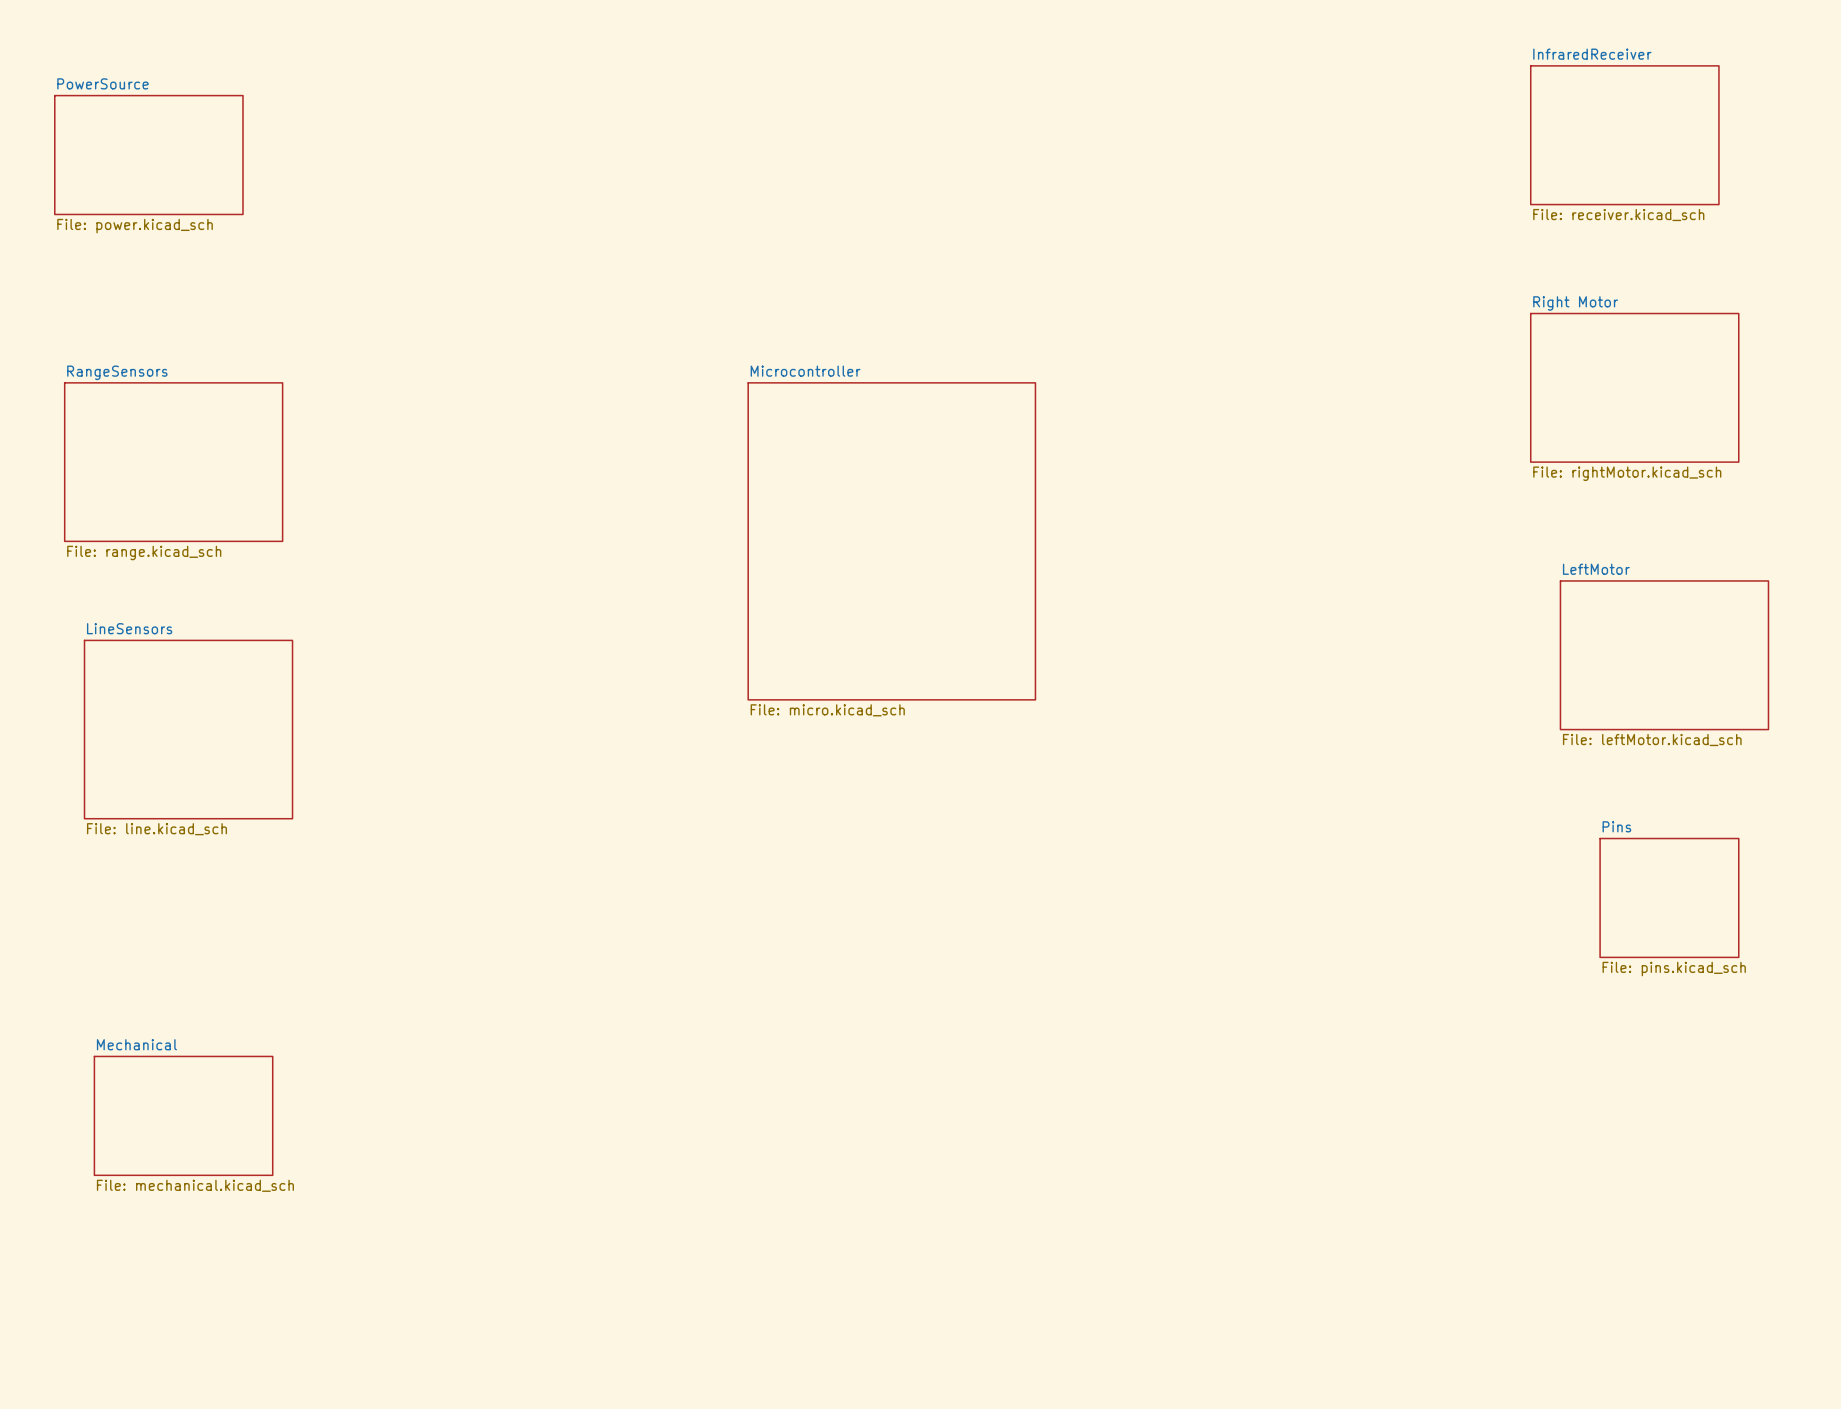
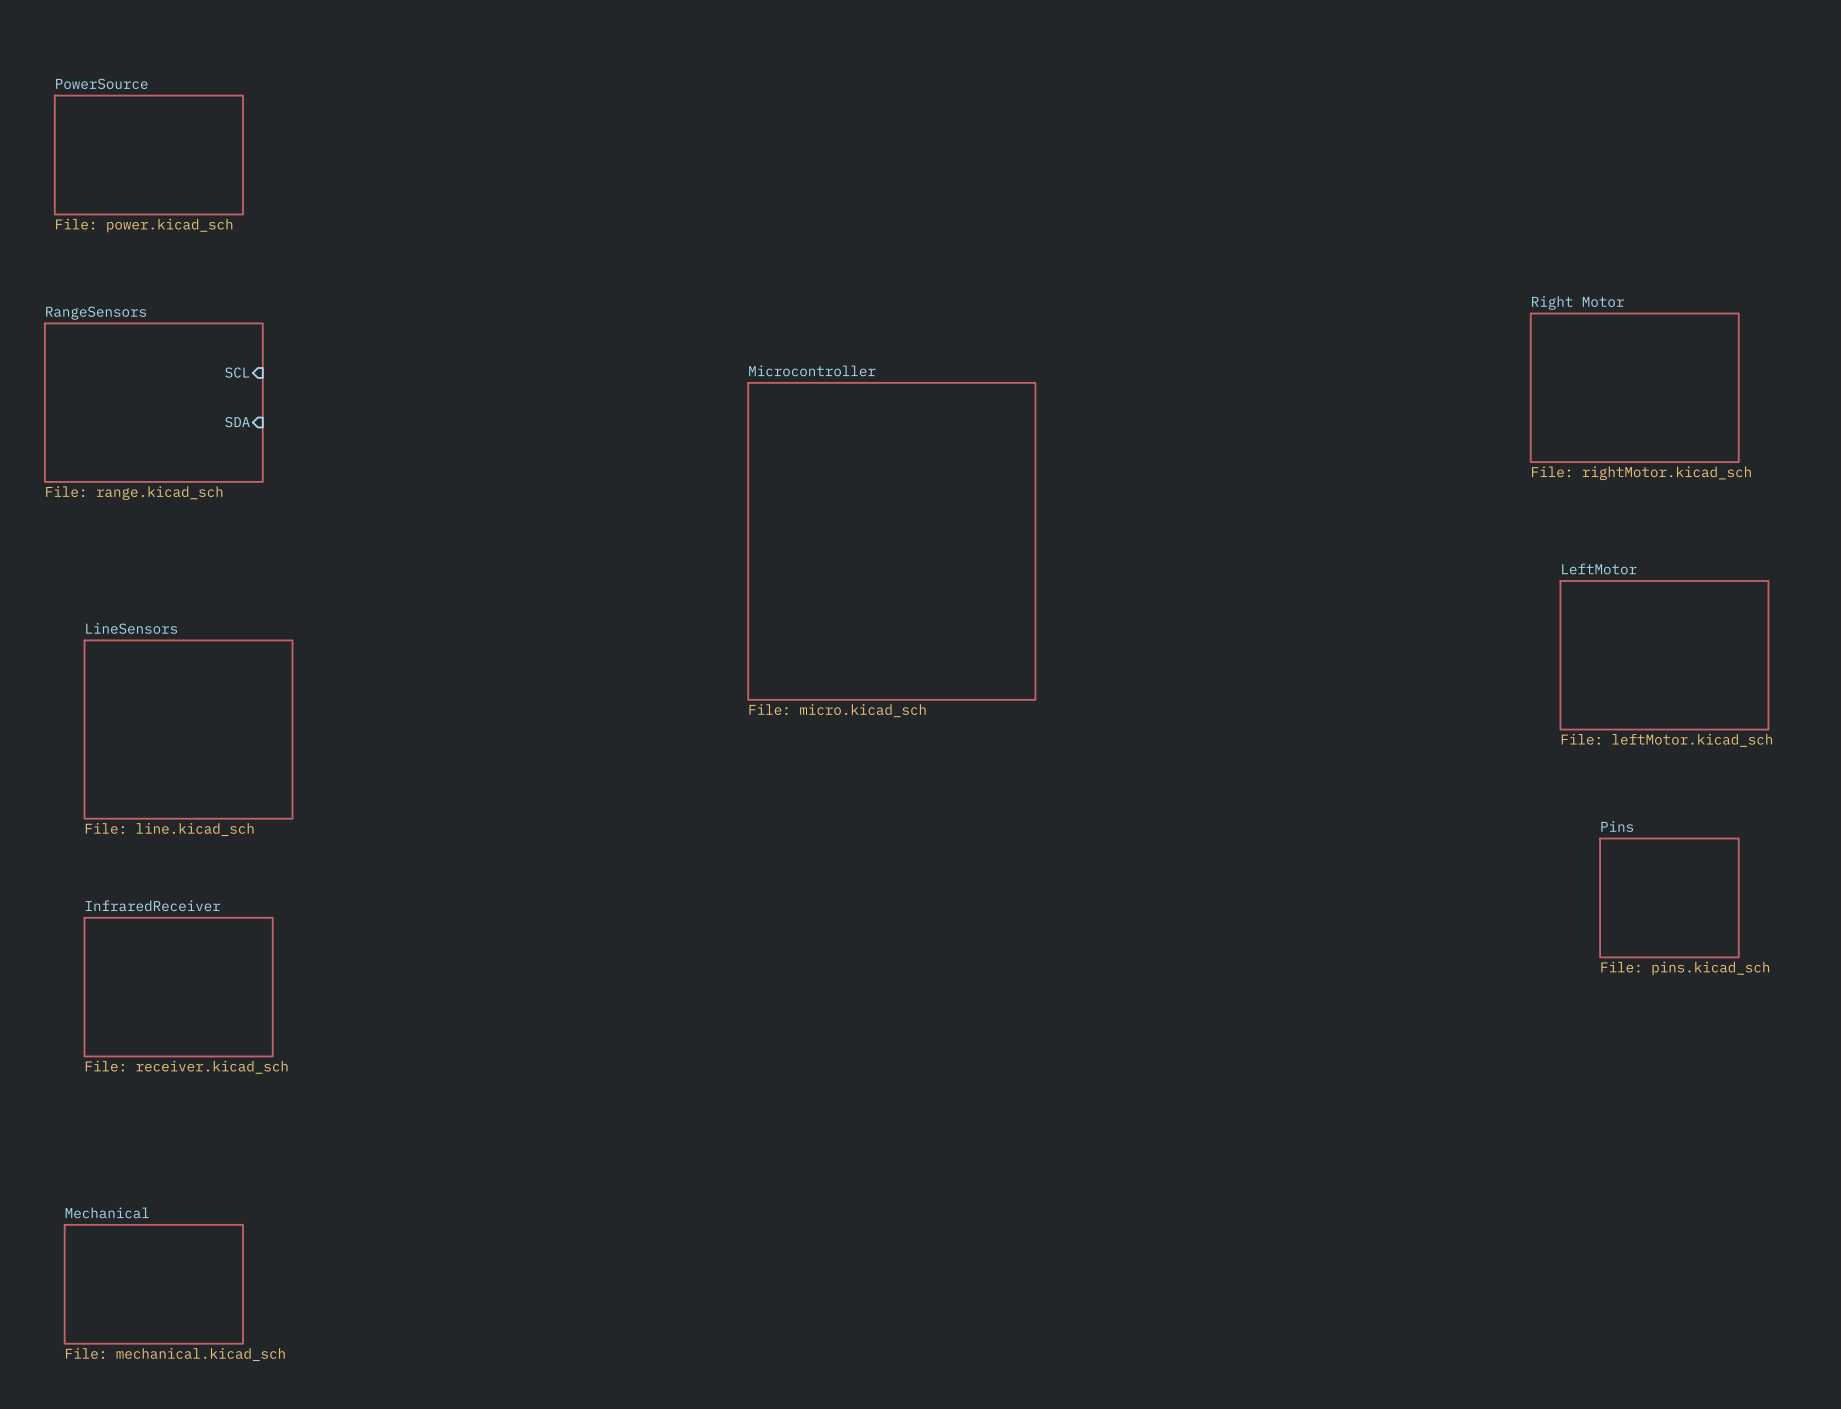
sheet InfraredReceiver: File: receiver.kicad_sch (1624, 135) -> none
sheet pin: none -> SCL (237, 372)
sheet pin: none -> SDA (237, 422)
sheet RangeSensors position: (173, 462) -> (153, 402)
sheet InfraredReceiver: none -> File: receiver.kicad_sch (178, 987)
sheet Mechanical position: (183, 1115) -> (153, 1284)

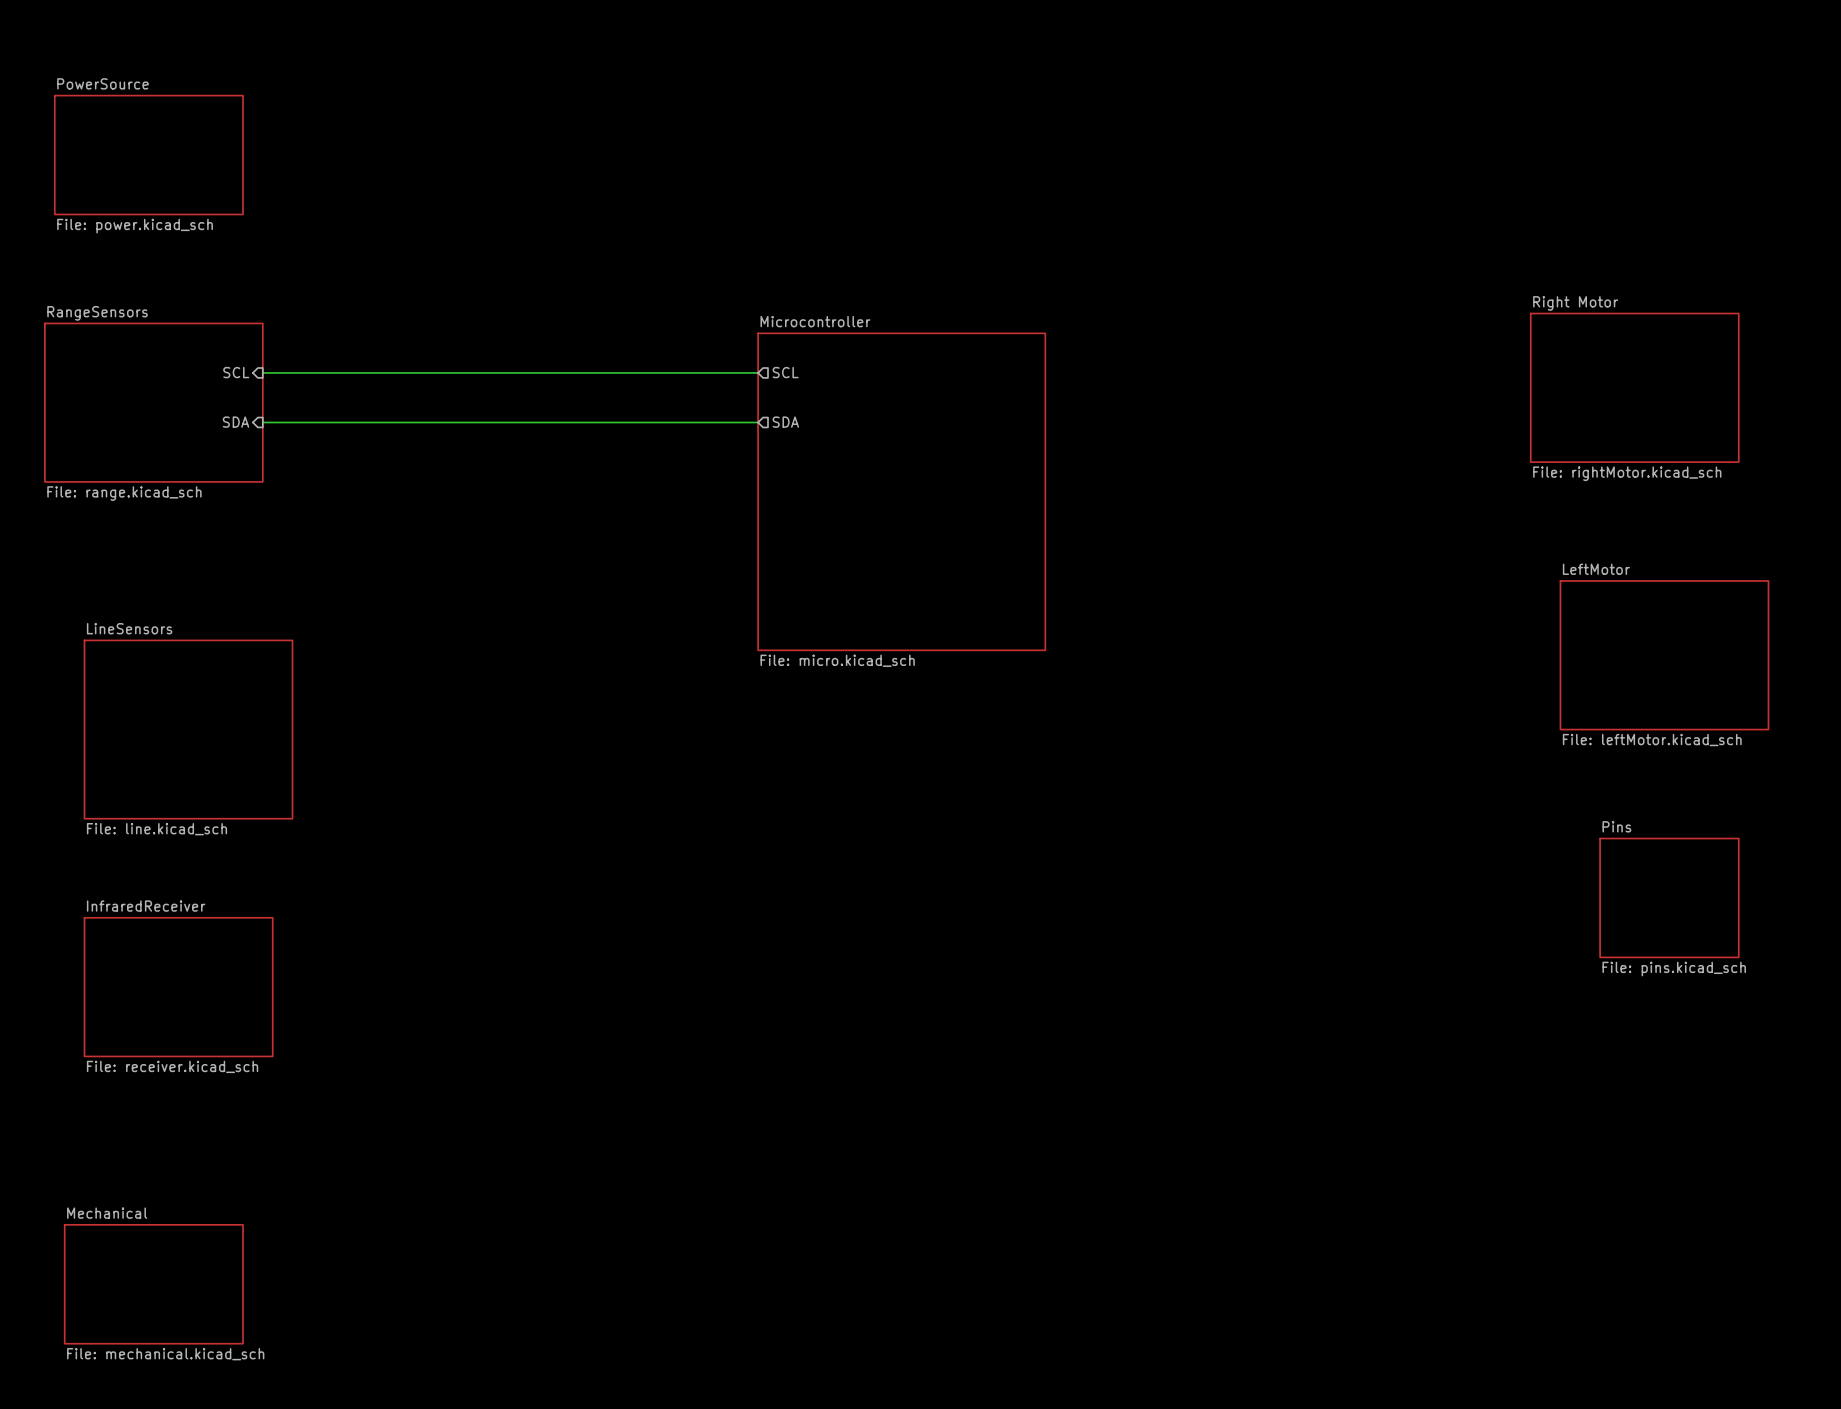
wire: none -> (262, 372) (758, 372)
sheet pin: none -> SCL (785, 372)
wire: none -> (262, 422) (758, 422)
sheet pin: none -> SDA (785, 422)
sheet Microcontroller position: (891, 541) -> (901, 491)

